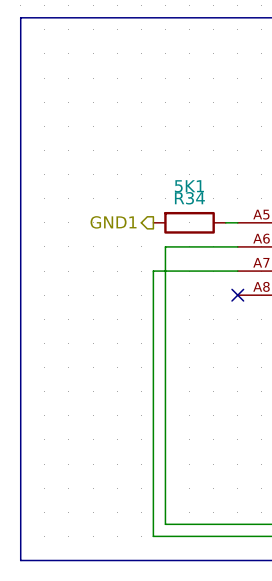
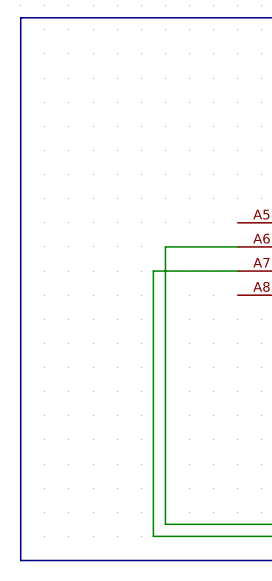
hierarchical label: GND1 (113, 222) -> none
R34: 5K1 (189, 222) -> none
wire: (225, 222) (237, 222) -> none
no-connect mark: (237, 295) -> none

